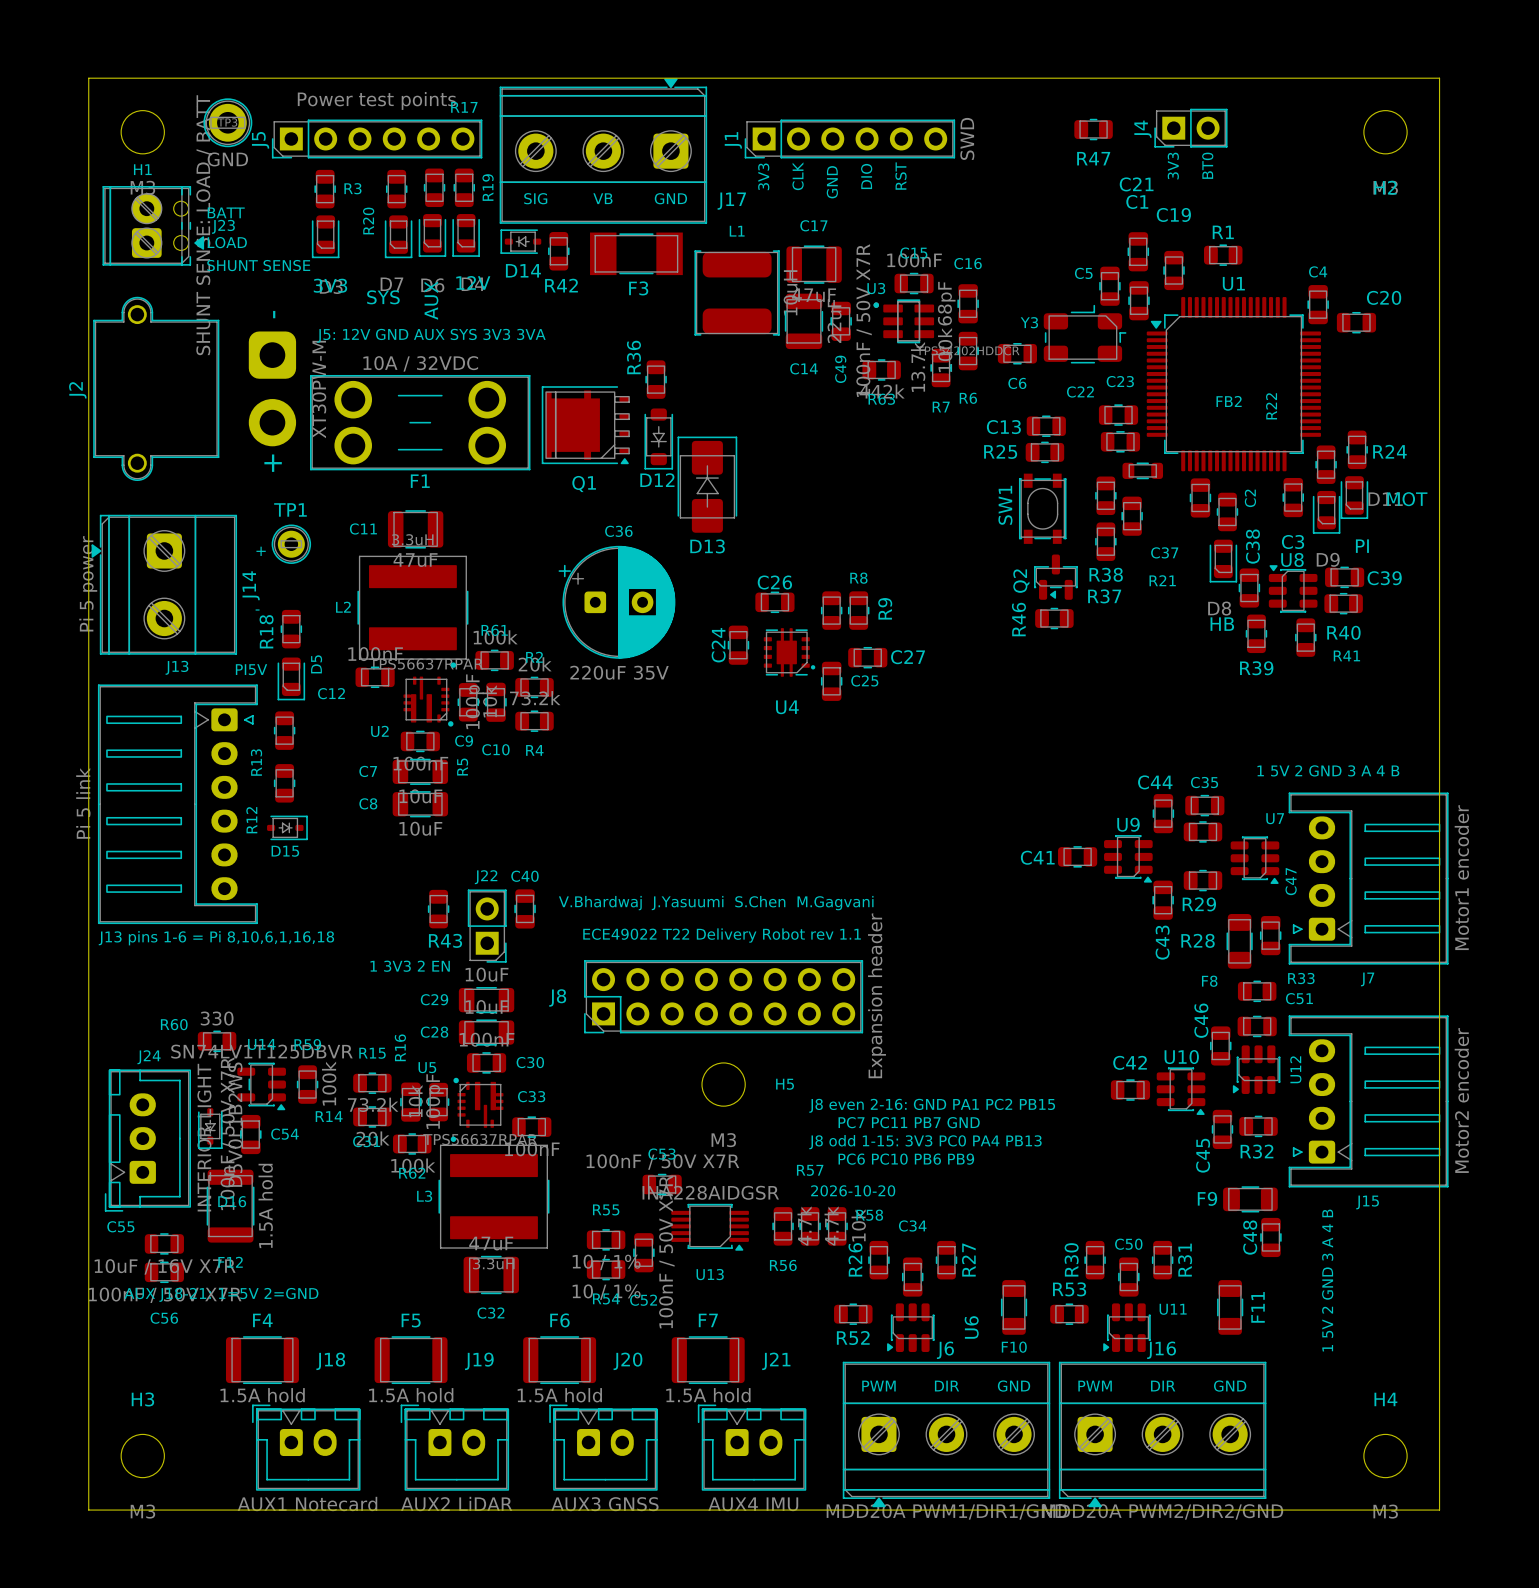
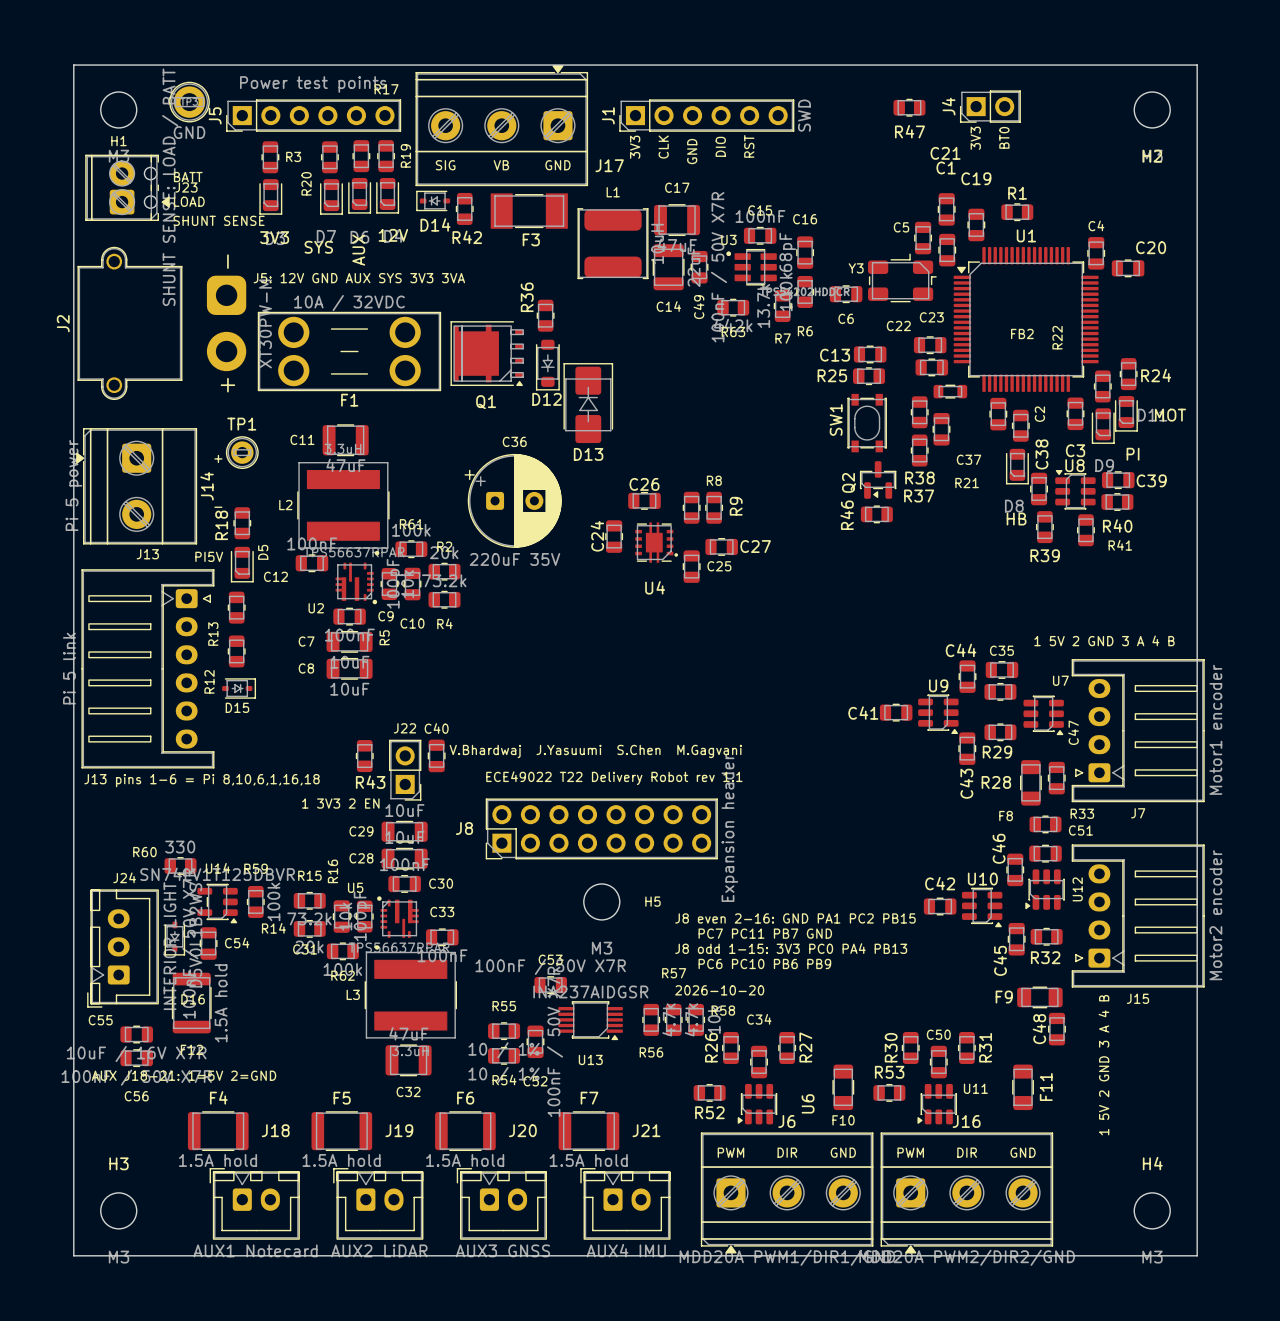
U13 value: INA228AIDGSR (710, 1192) -> INA237AIDGSR (590, 991)

